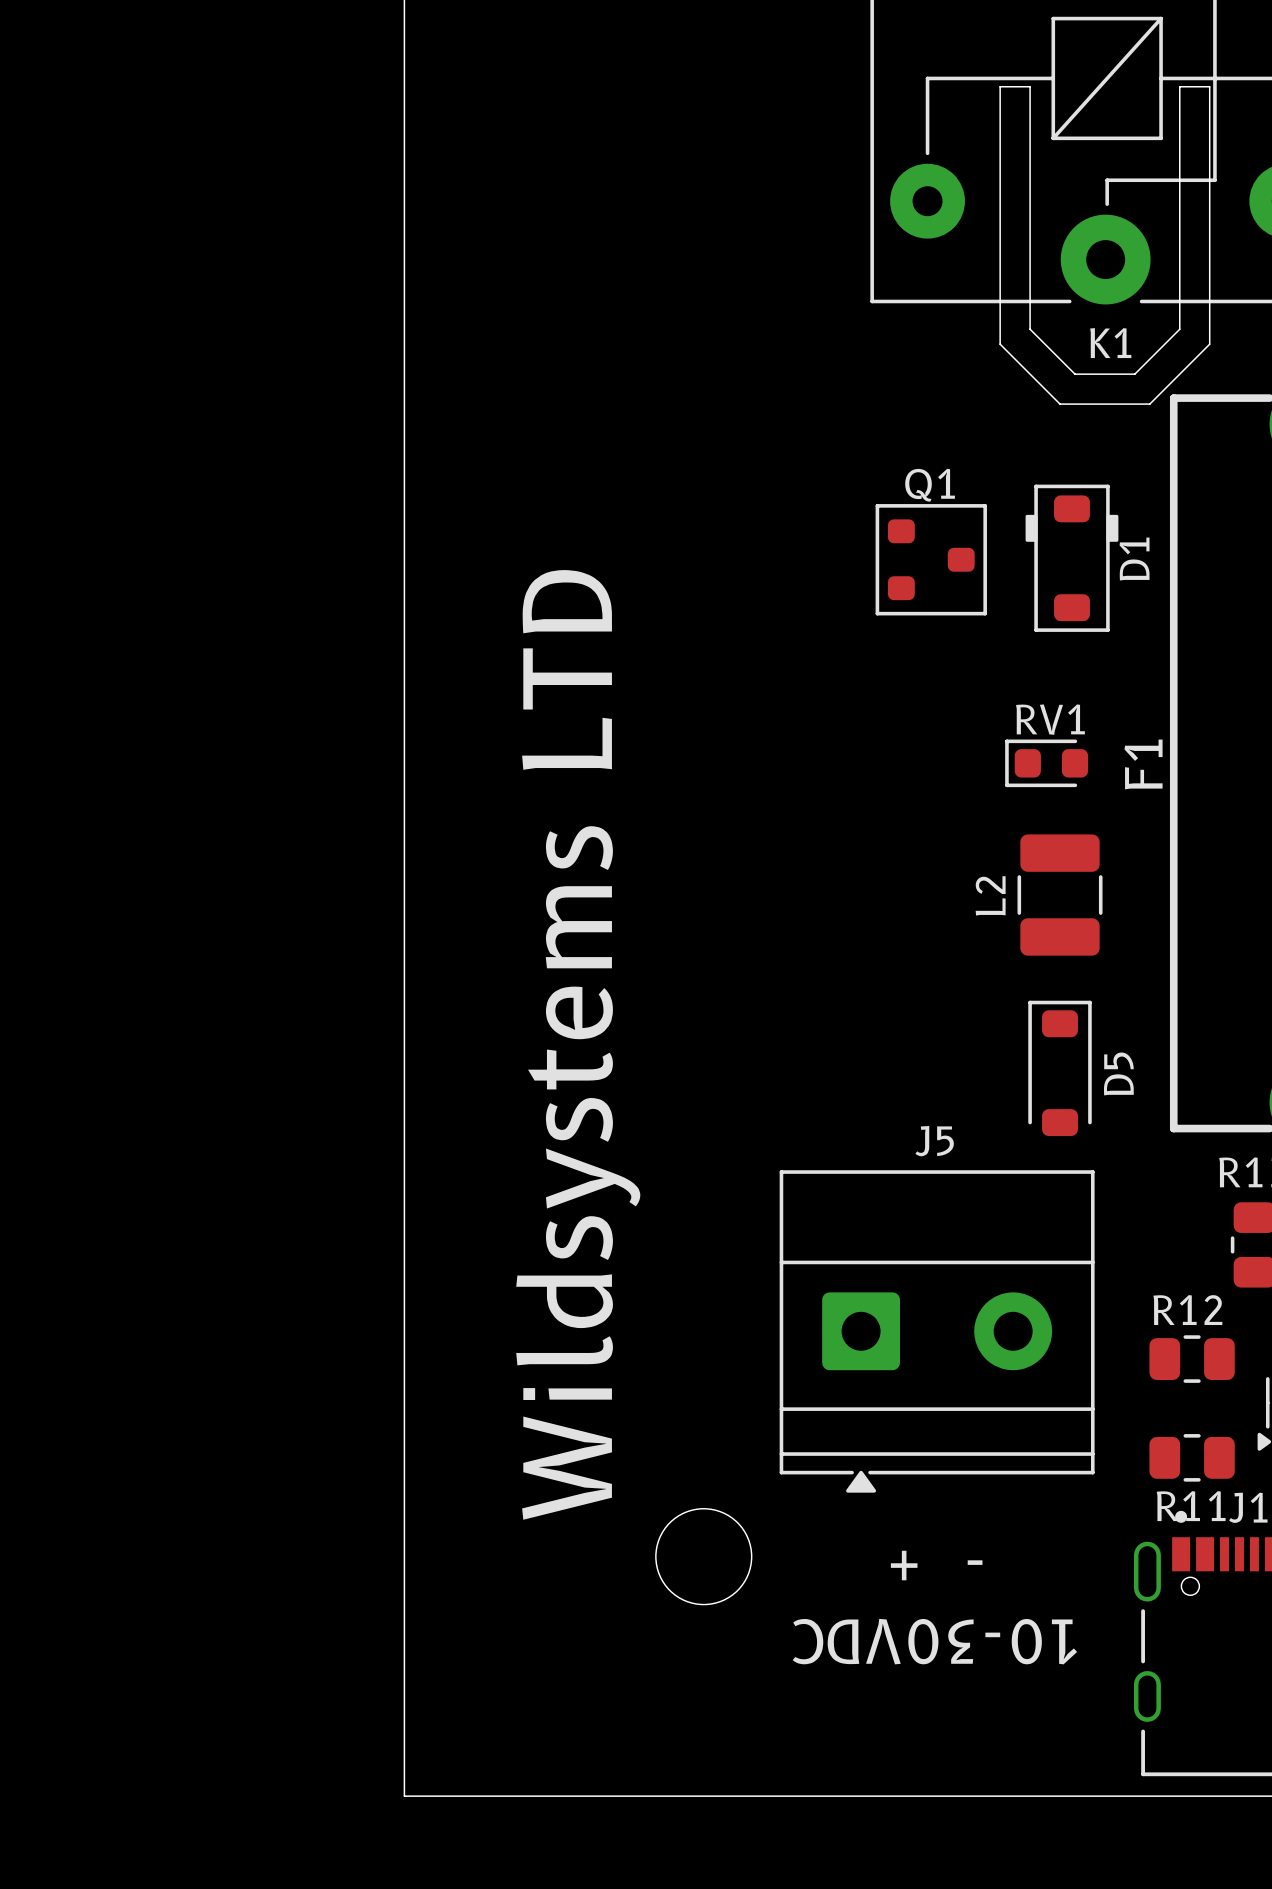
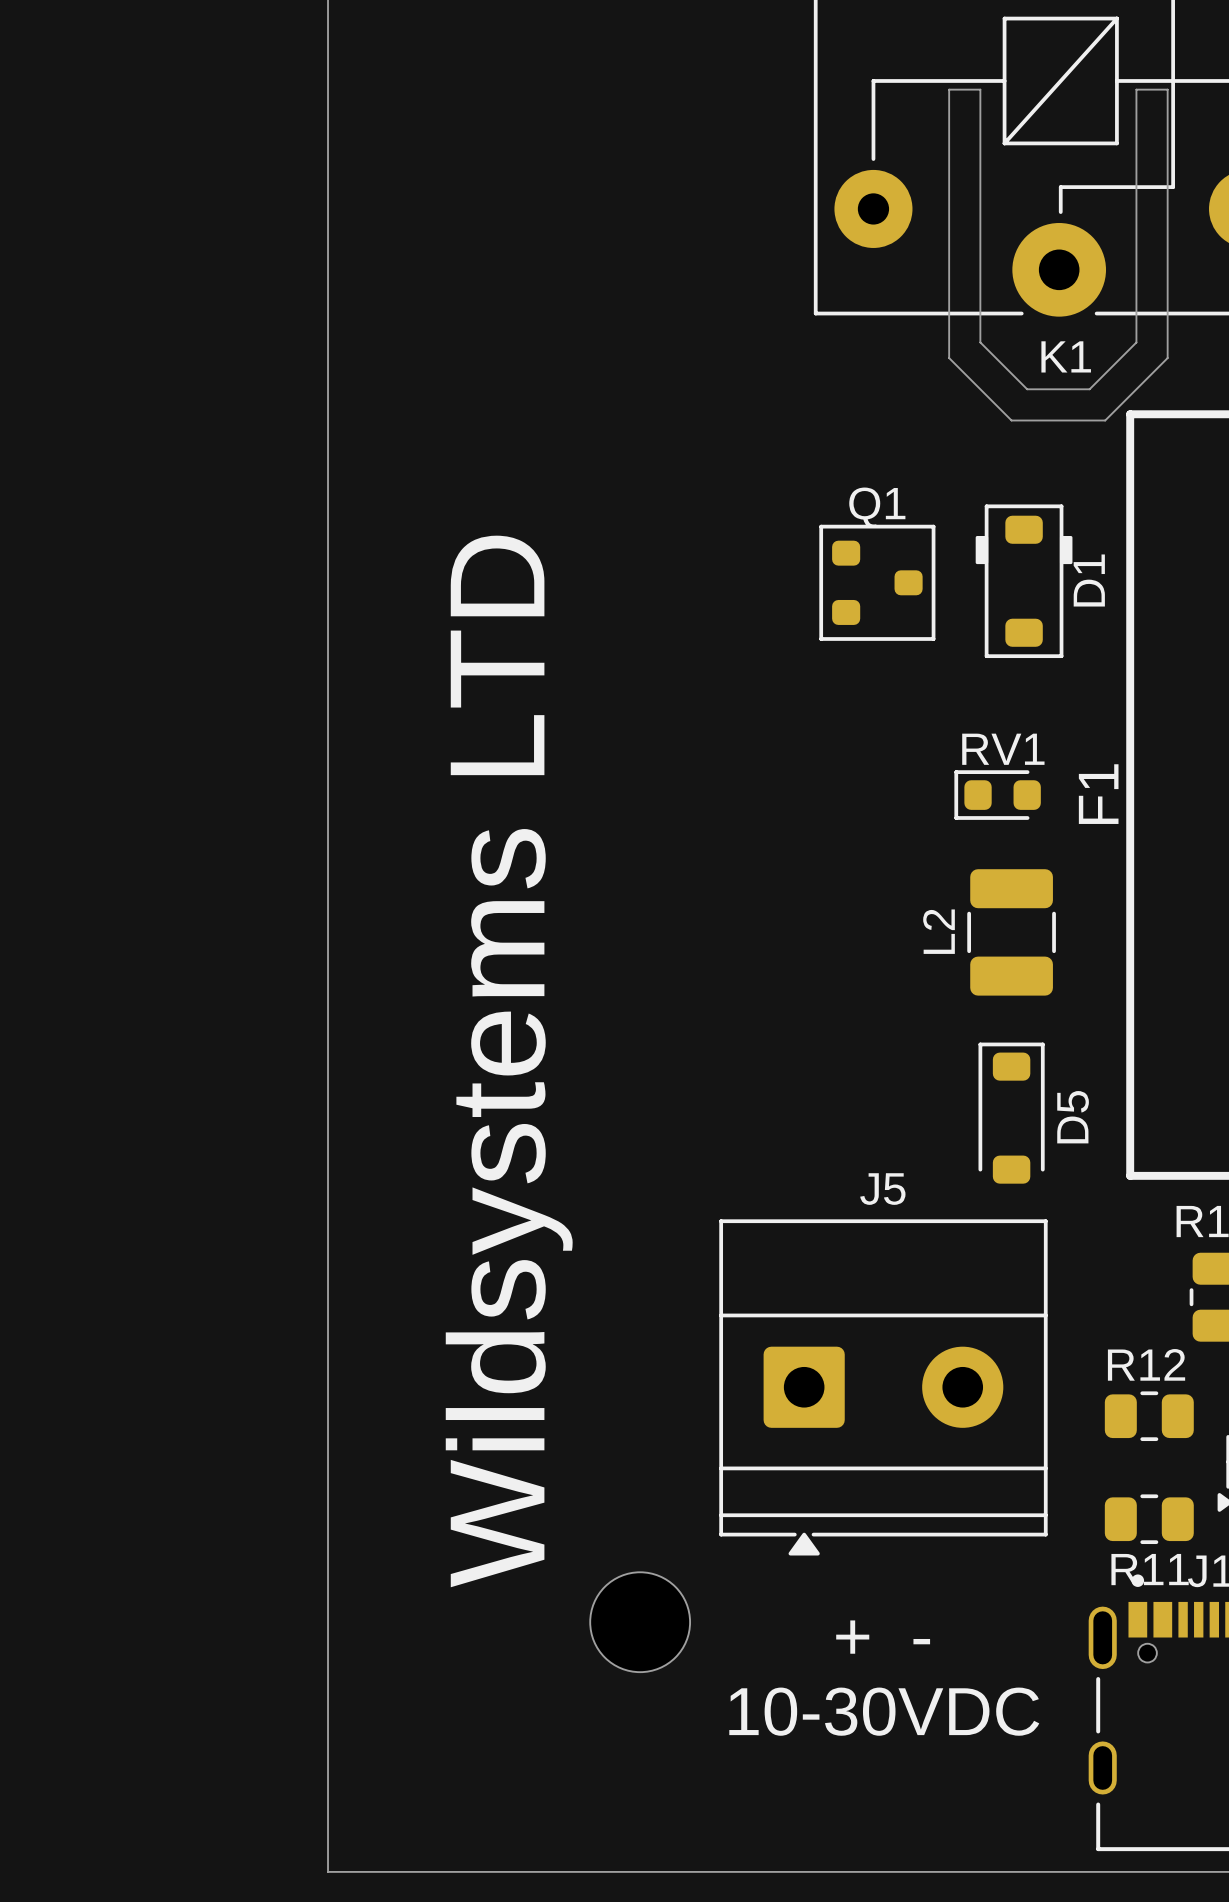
text: - + (936, 1565) -> none
text: 10-30VDC (934, 1641) -> + - (883, 1637)
text: none -> 10-30VDC (884, 1711)

